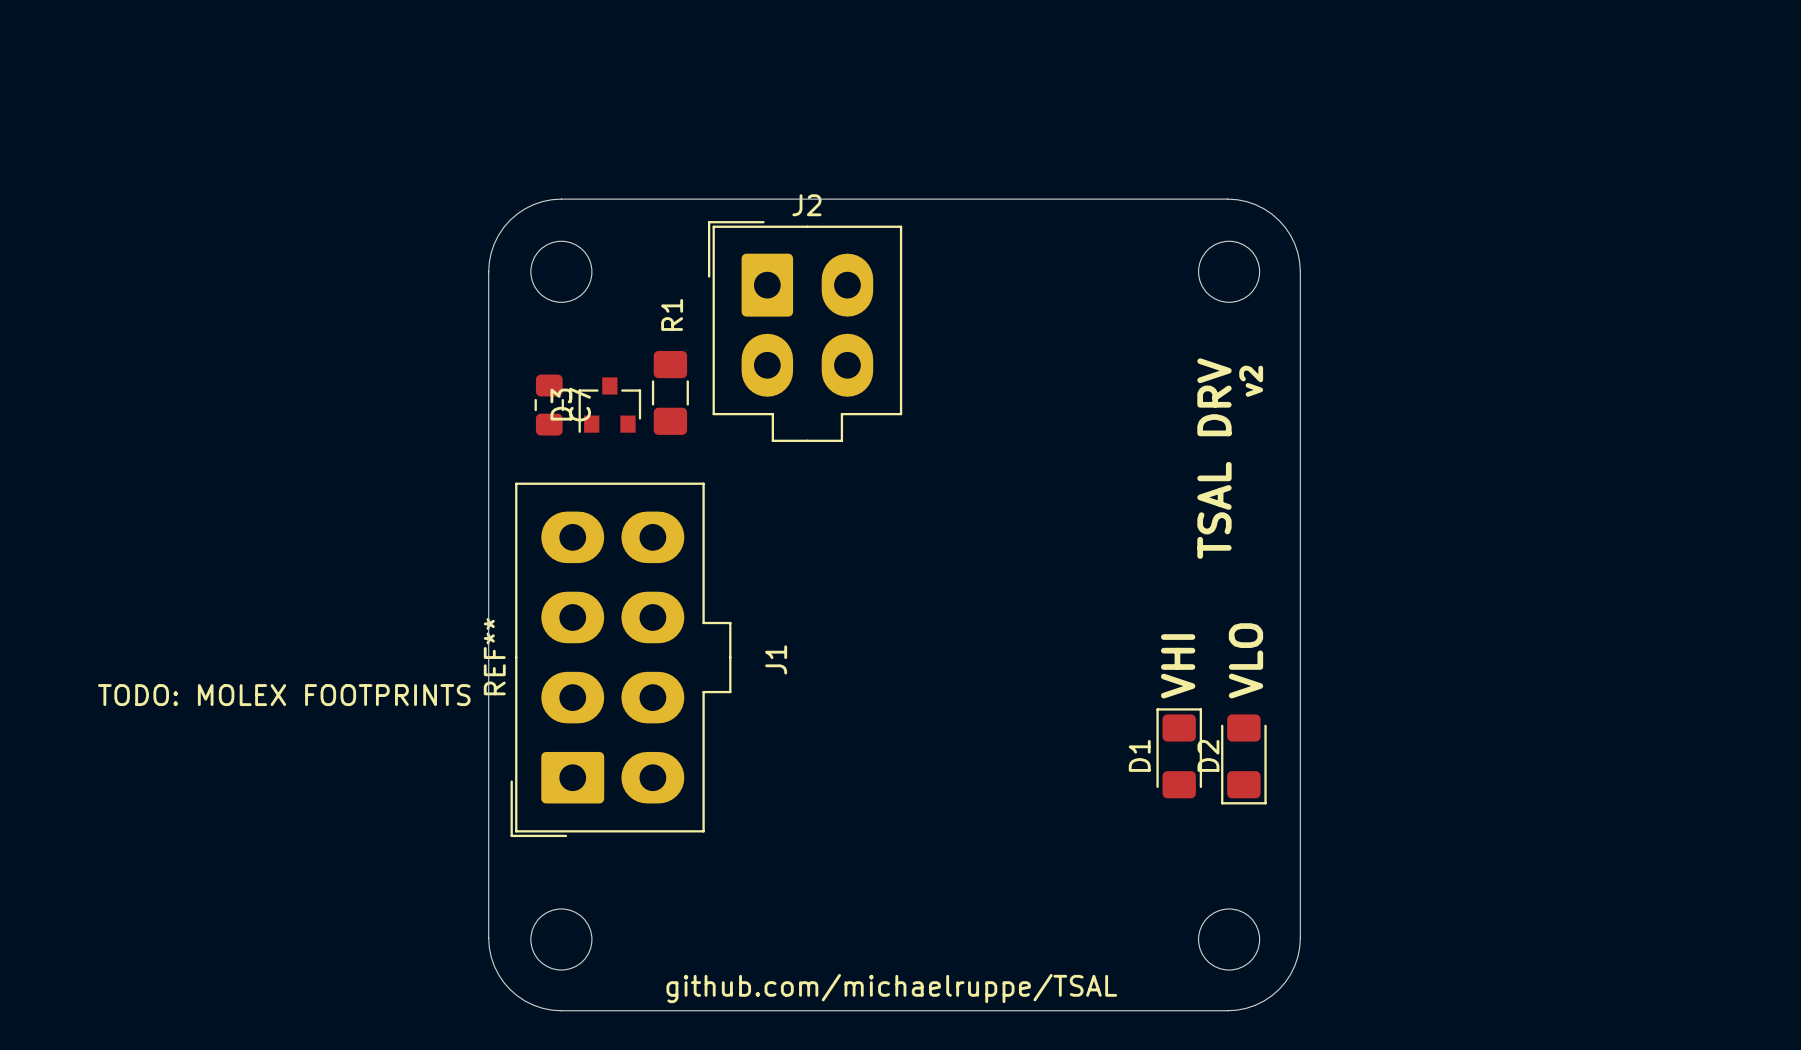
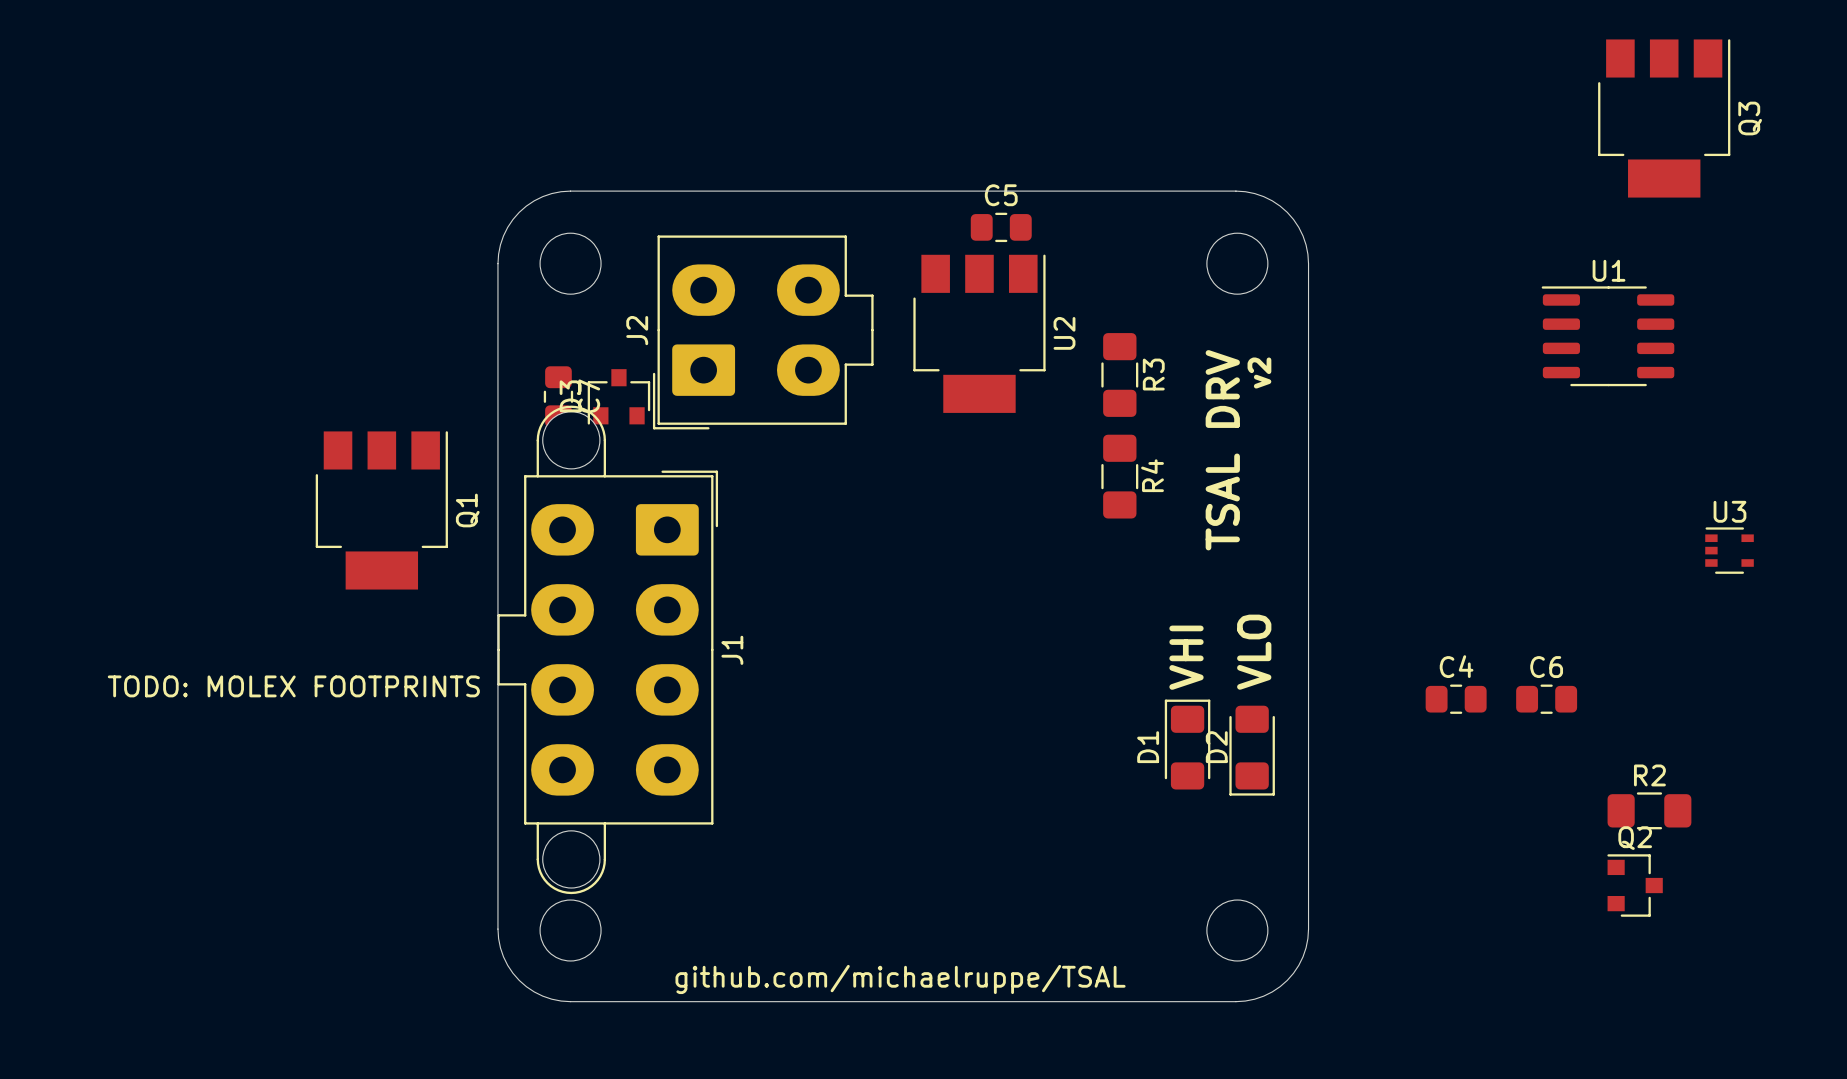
Q3: none -> (1664, 118)
J2 name position: J2 (806, 205) -> J2 (637, 330)
J2 footprint: [707, 221, 903, 442] -> [652, 235, 874, 430]
C5: none -> (1001, 227)
U2: none -> (979, 333)
U1: none -> (1607, 336)
R3: none -> (1119, 374)
R1: (670, 392) -> none
J1 footprint: [510, 482, 732, 838] -> [497, 405, 719, 895]
R4: none -> (1119, 476)
Q1: none -> (381, 510)
U3: none -> (1729, 550)
C4: none -> (1456, 699)
C6: none -> (1546, 699)
R2: none -> (1649, 810)
Q2: none -> (1635, 885)

